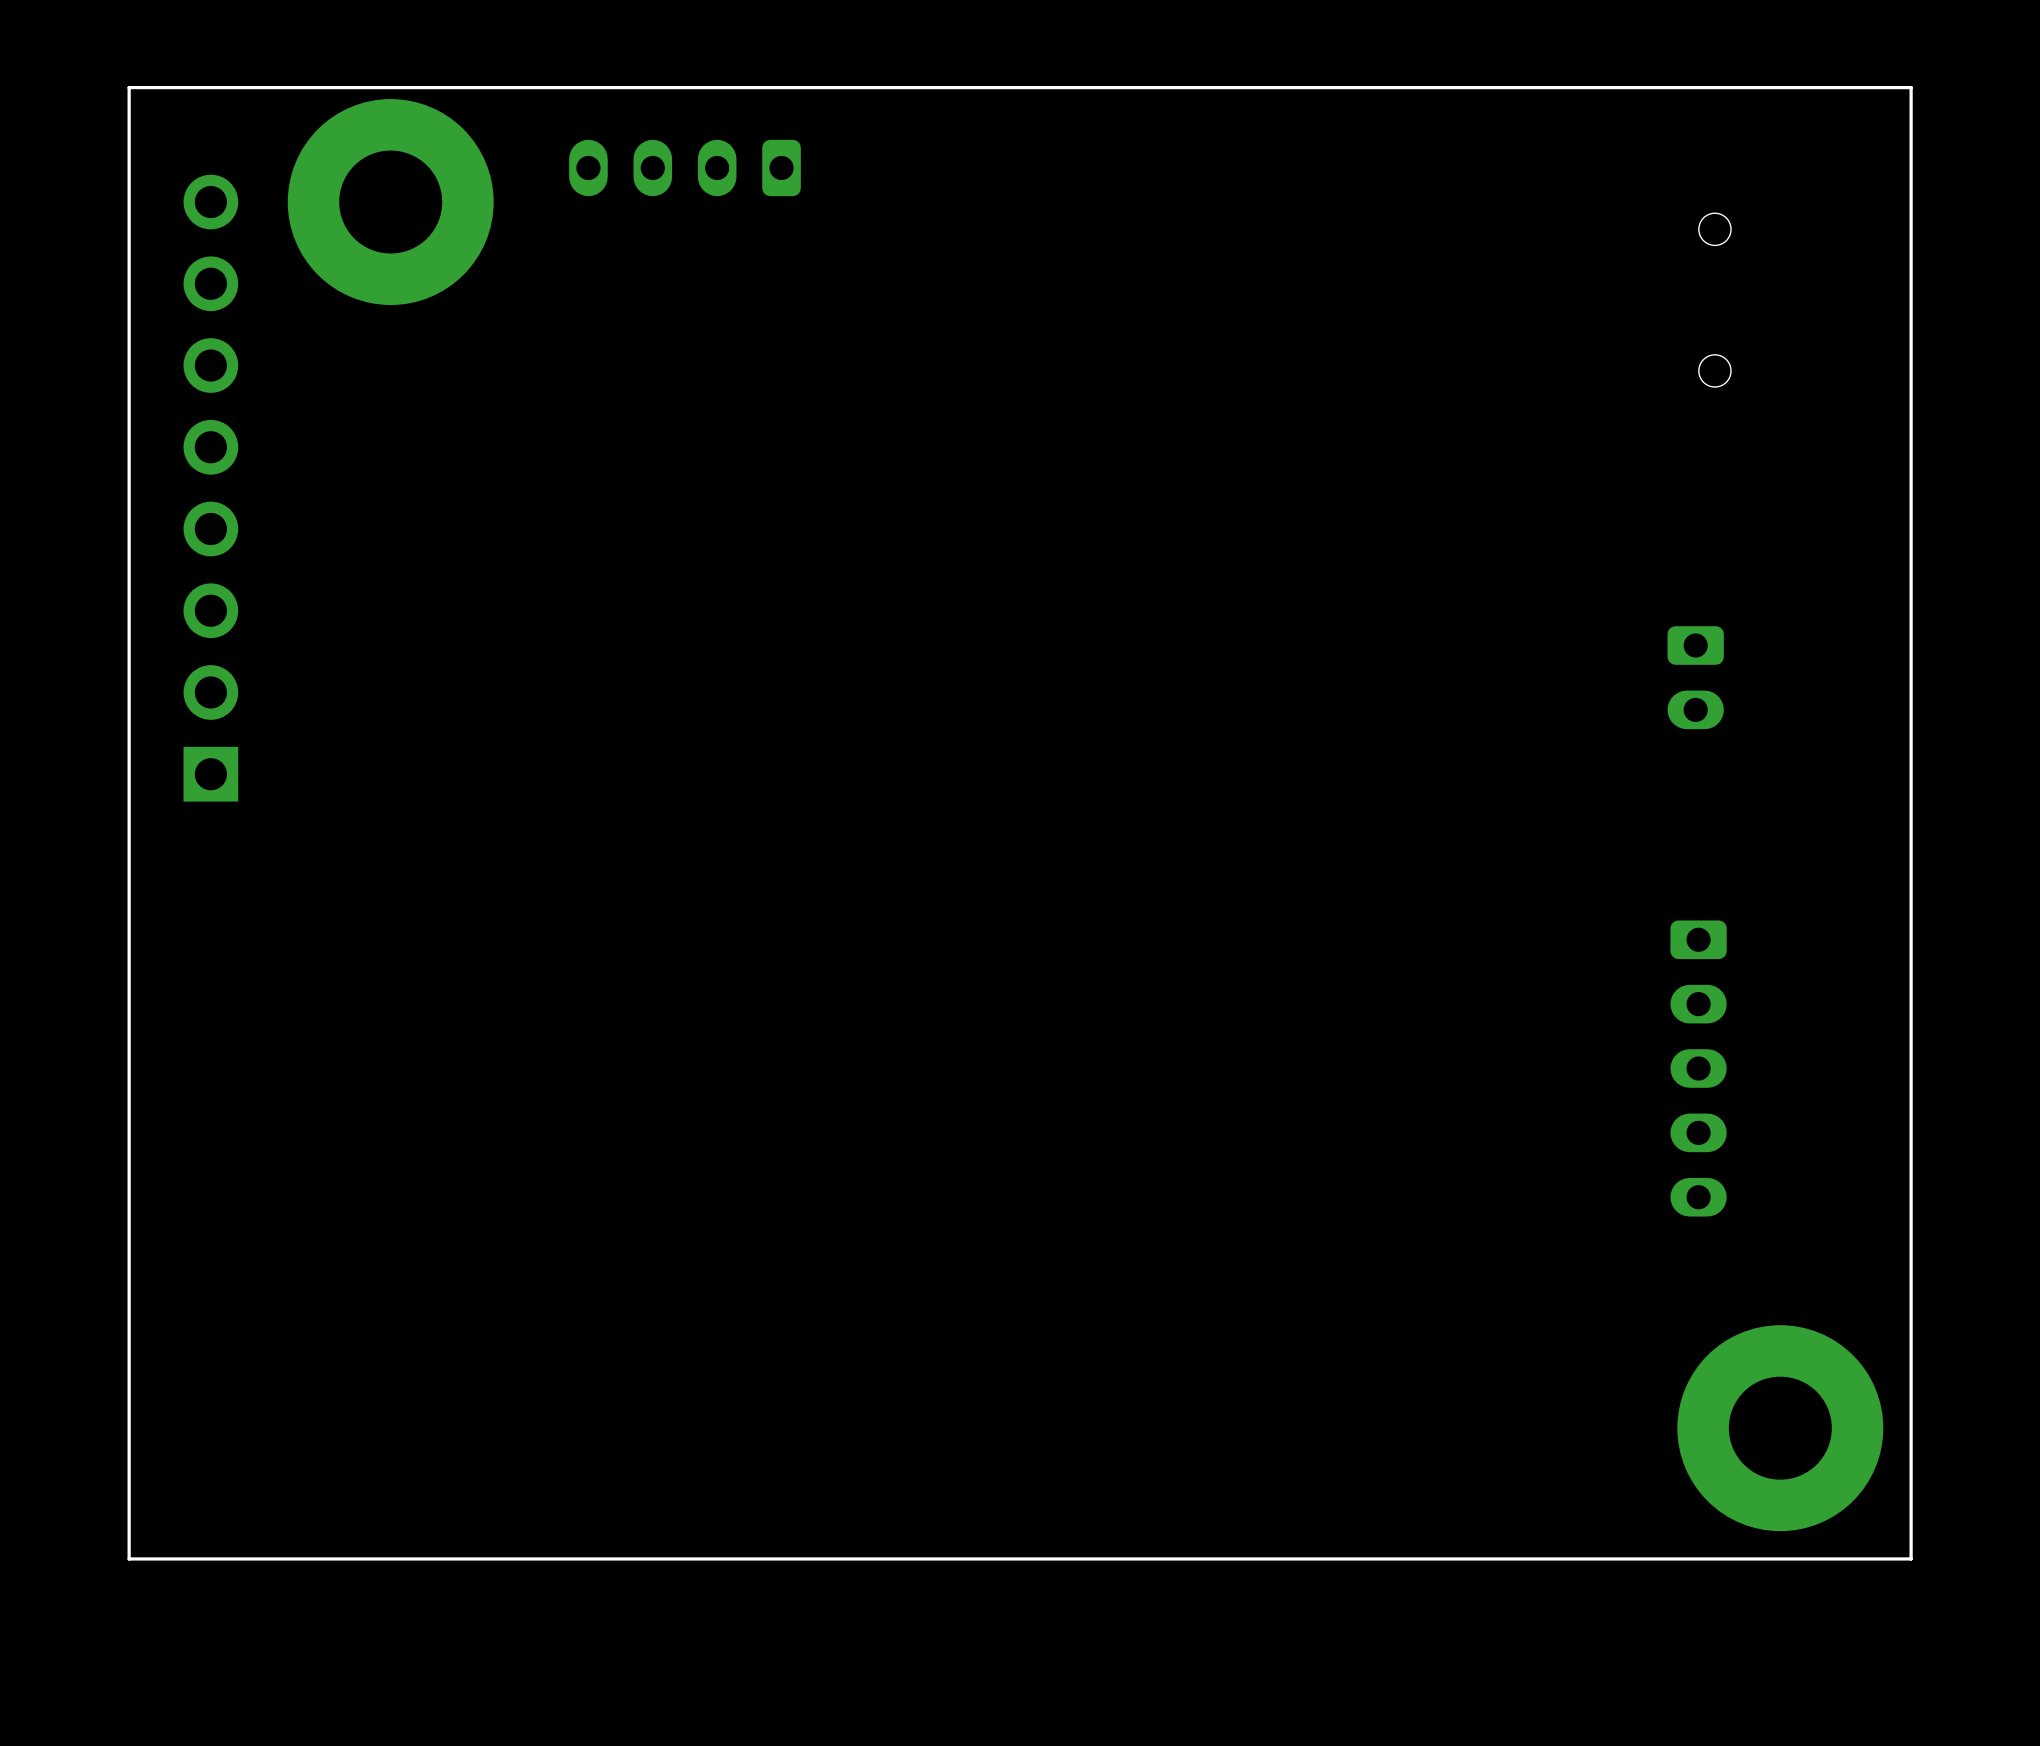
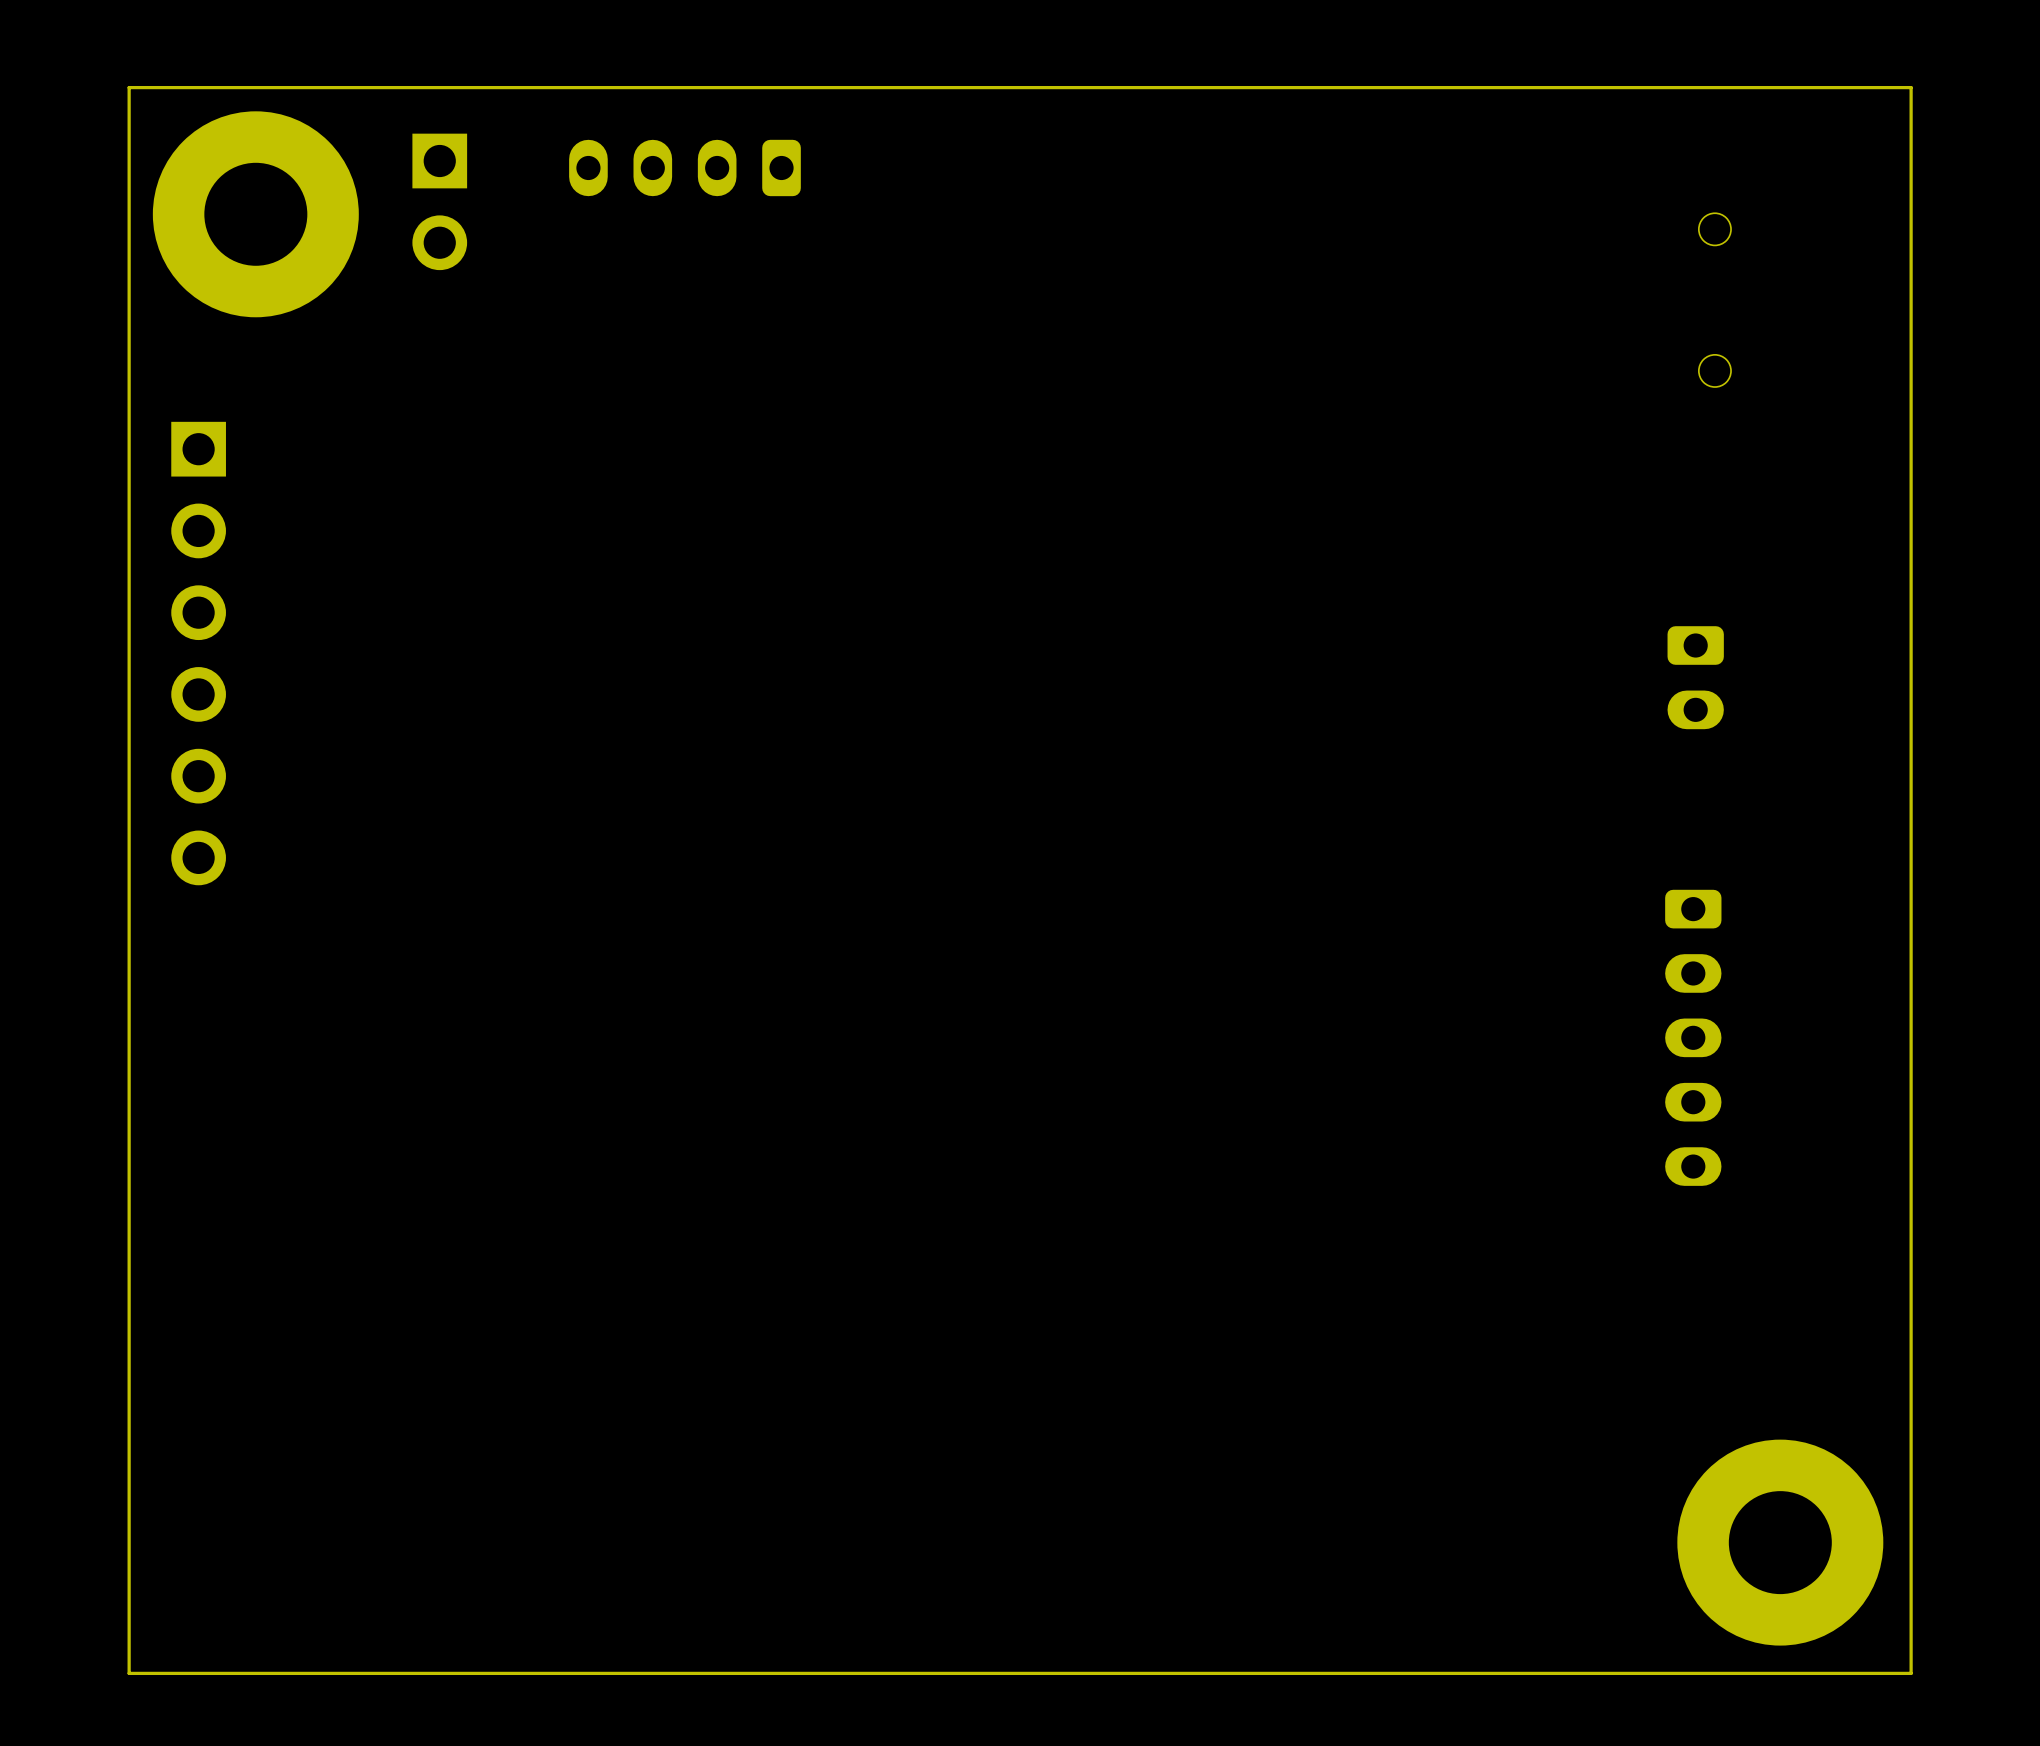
part: none -> (439, 201)
part position: (390, 202) -> (255, 214)
part: (210, 488) -> none
part: none -> (198, 653)
part position: (1698, 1068) -> (1693, 1037)
part position: (1780, 1428) -> (1780, 1542)
board edge: (1911, 1558) (129, 1558) -> (1911, 1558) (1911, 1673) (129, 1673) (129, 1558)

